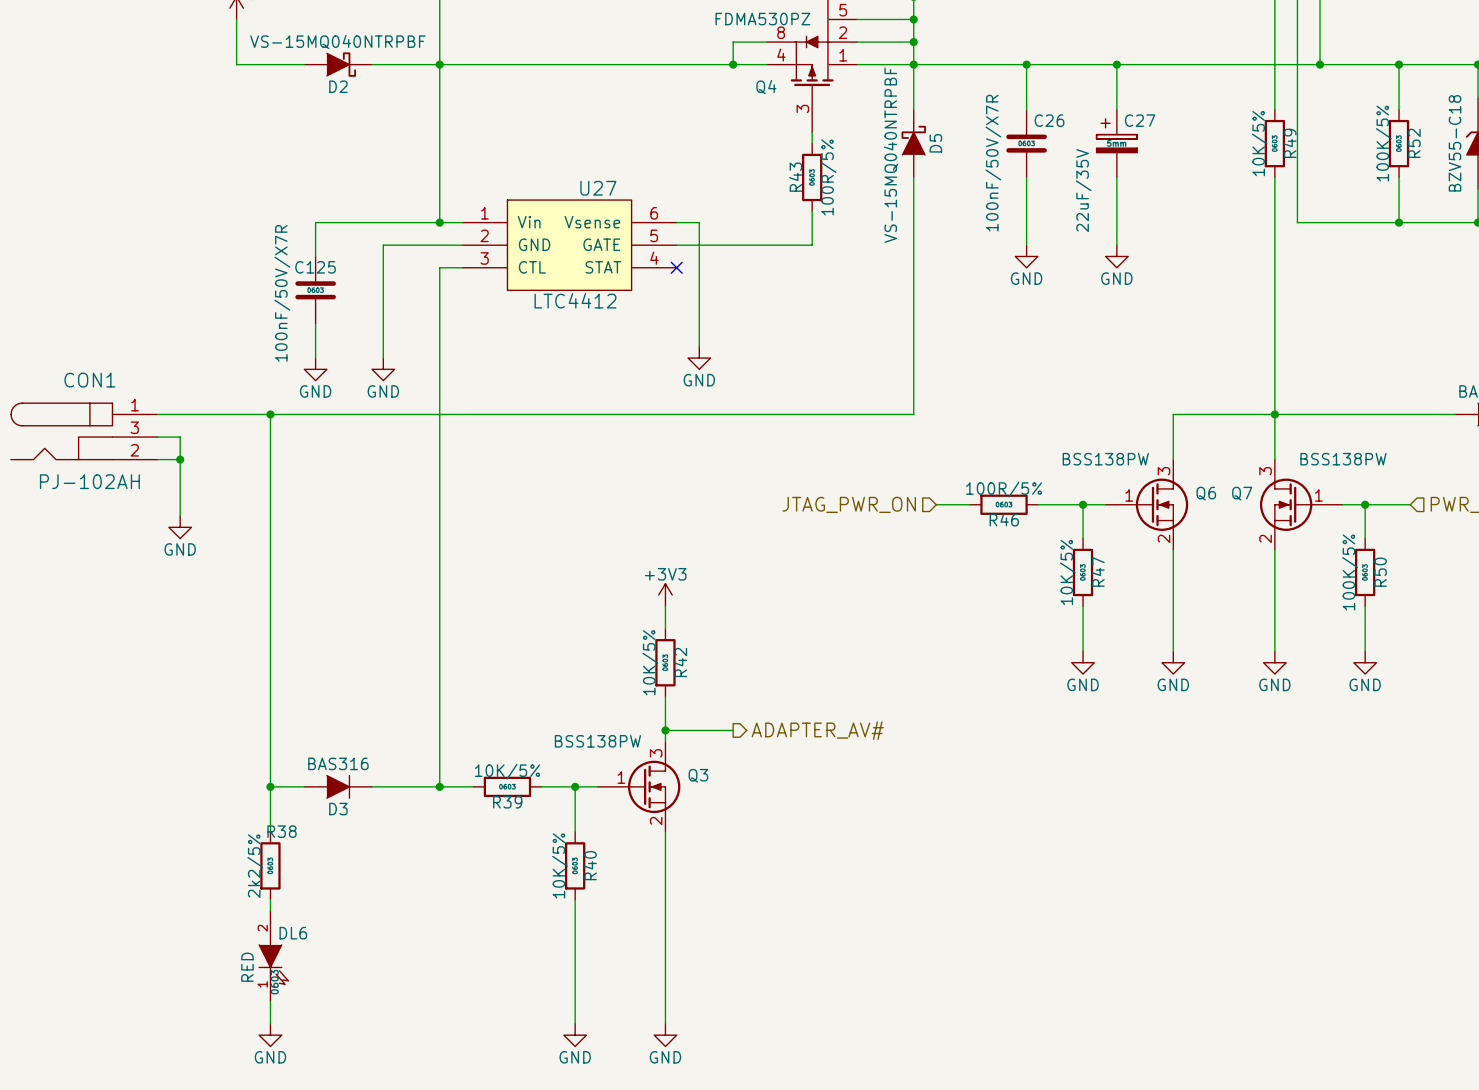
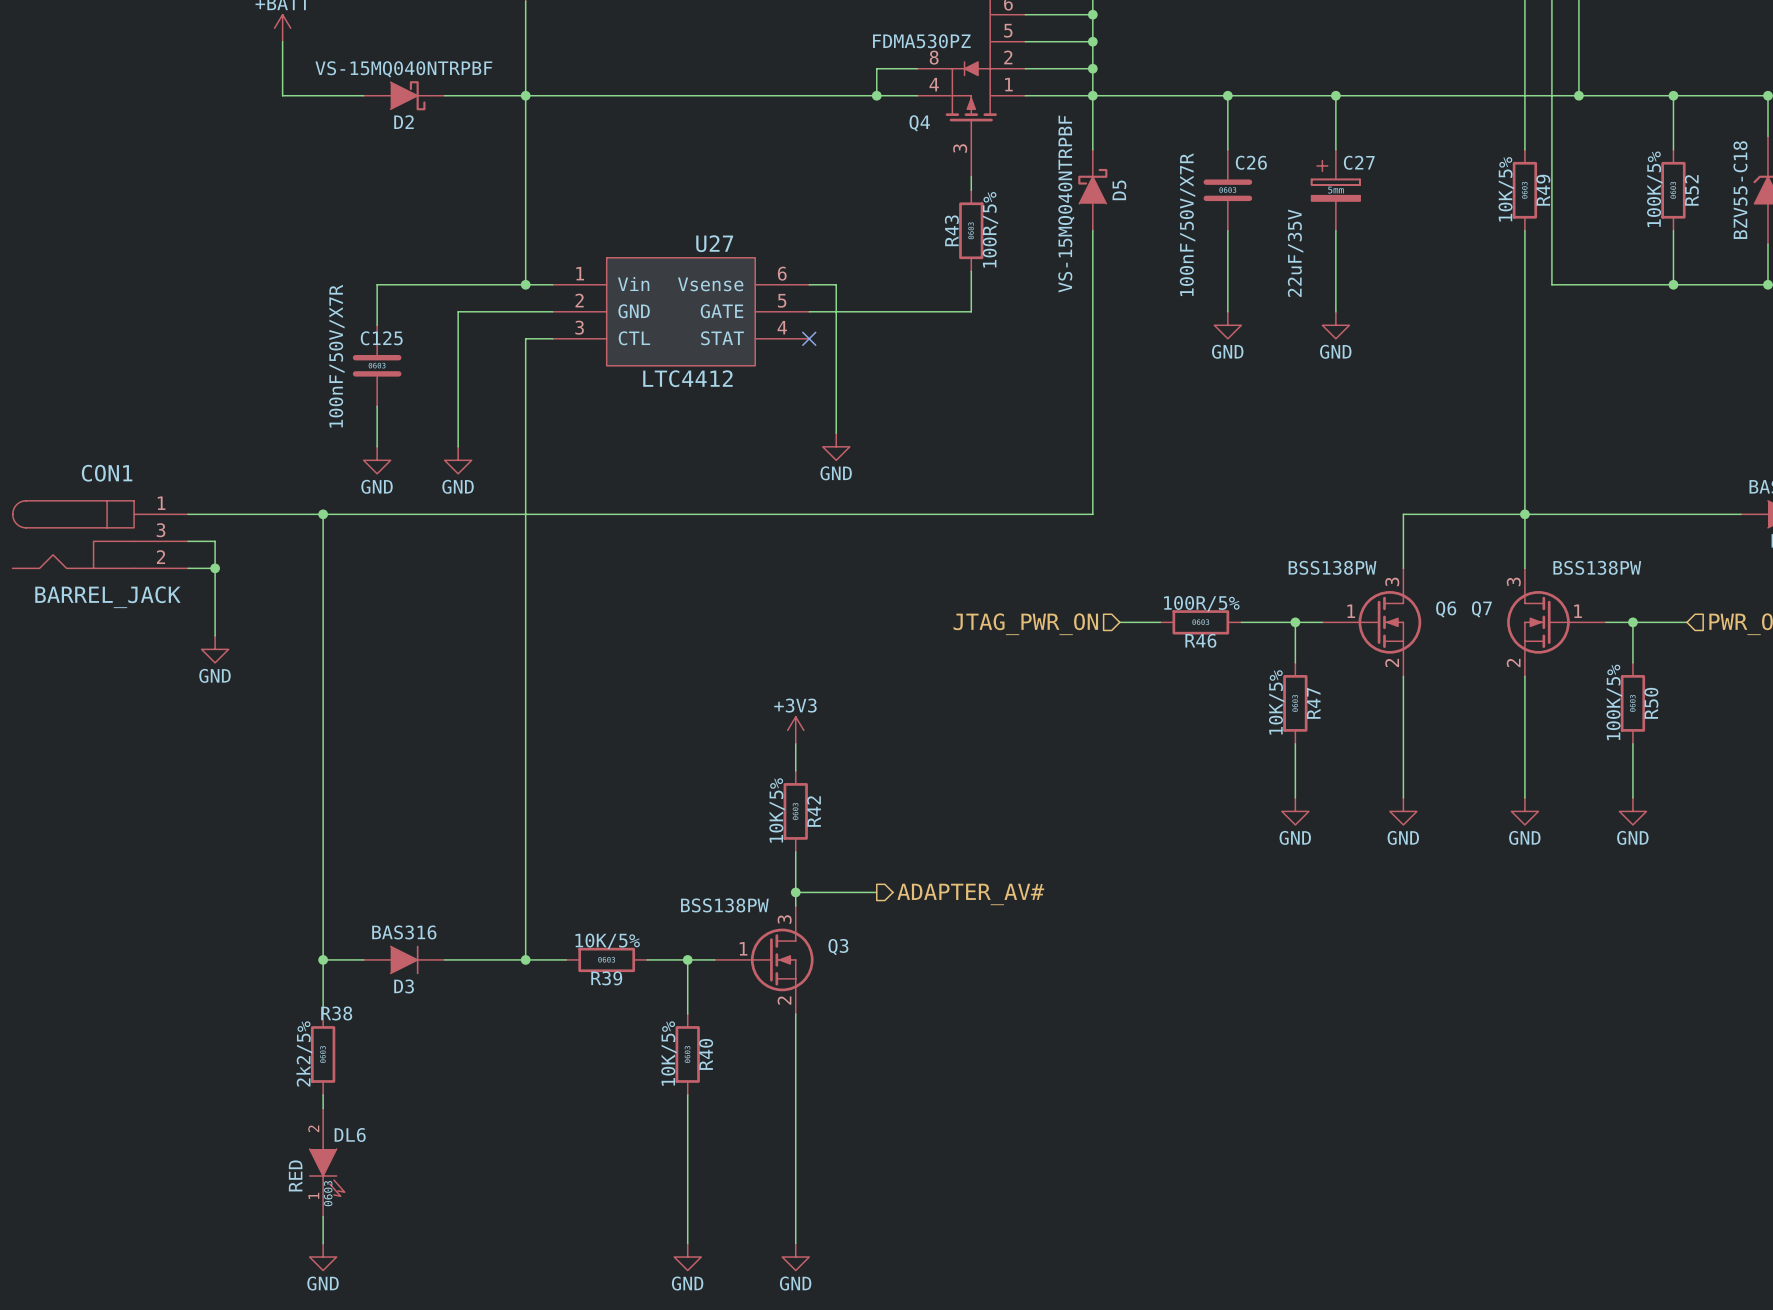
CON1 value: PJ-102AH (89, 481) -> BARREL_JACK (107, 597)

